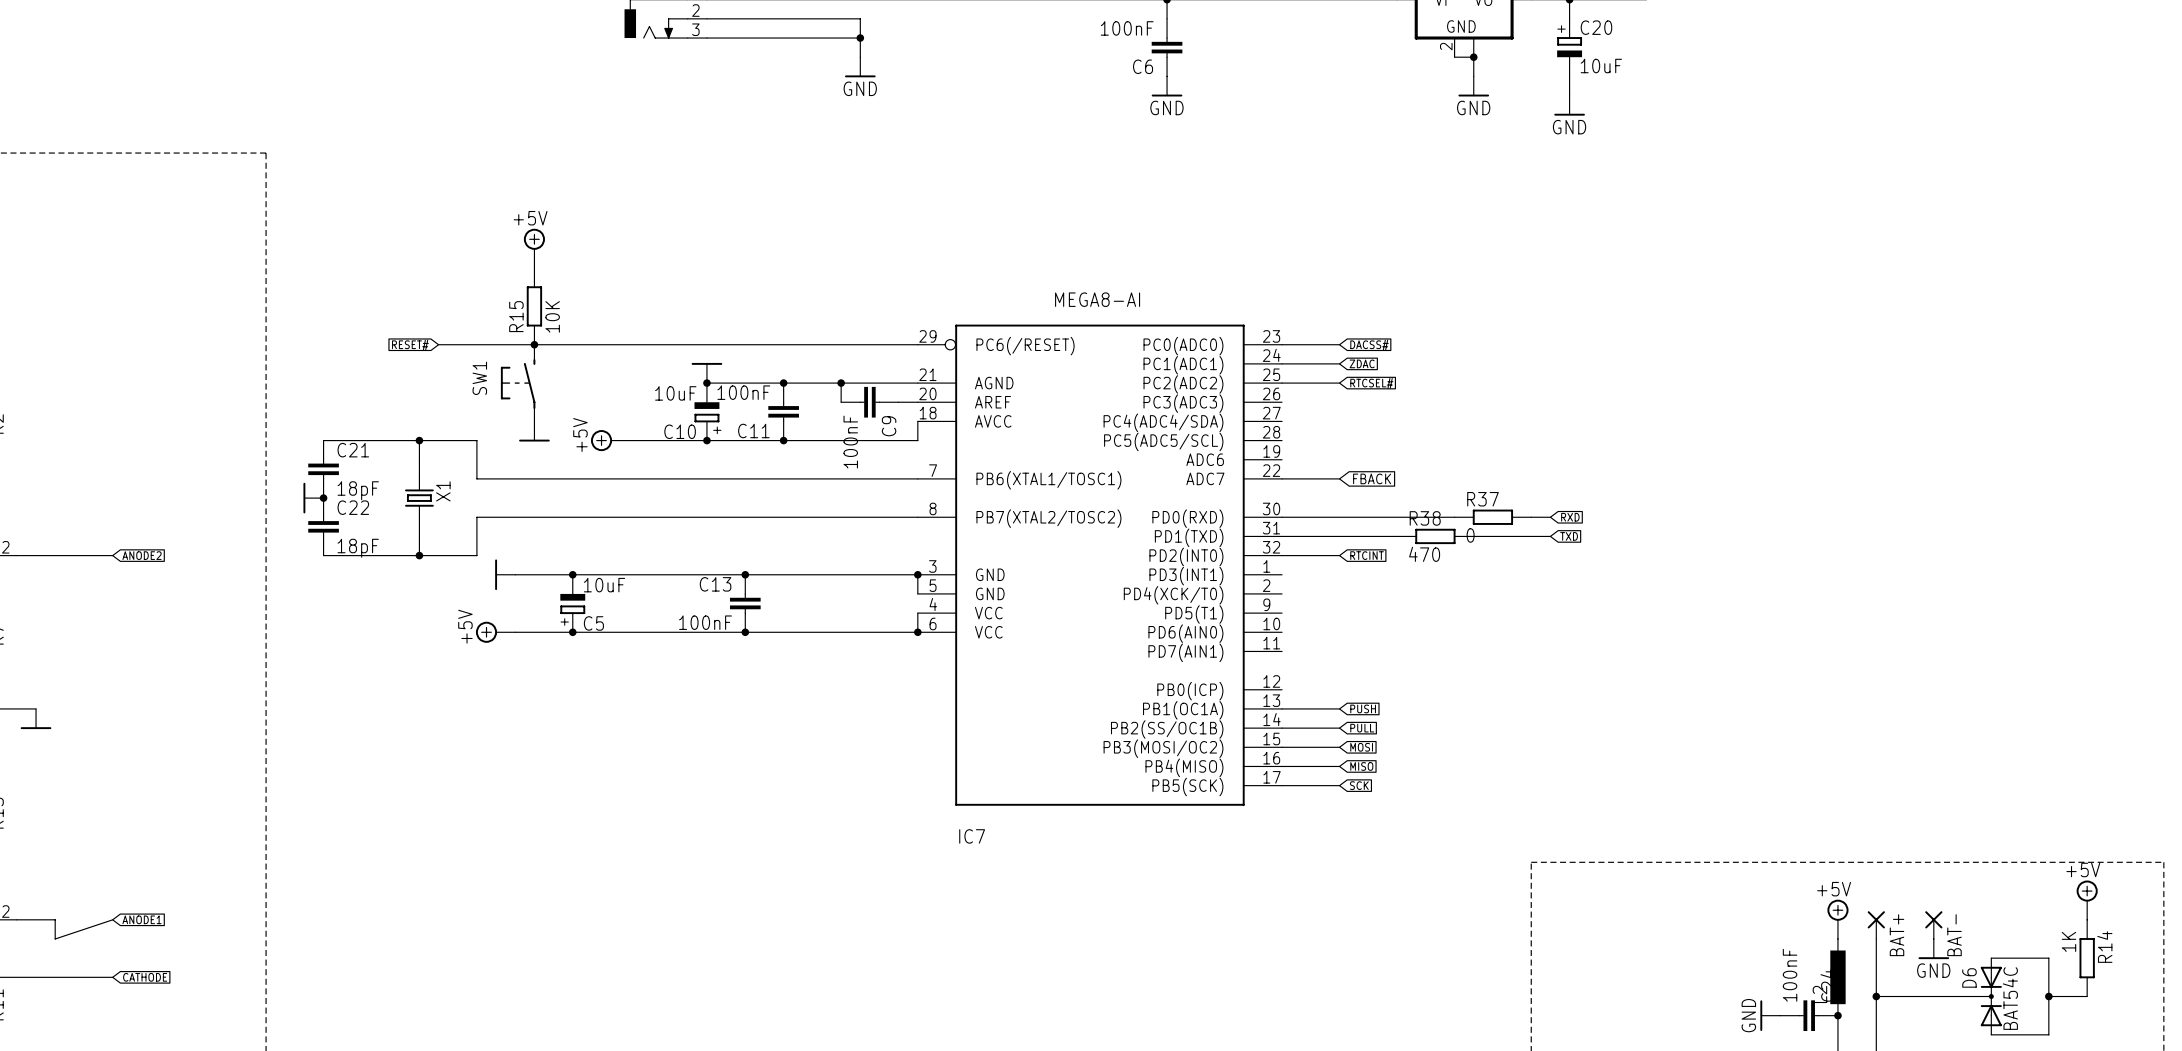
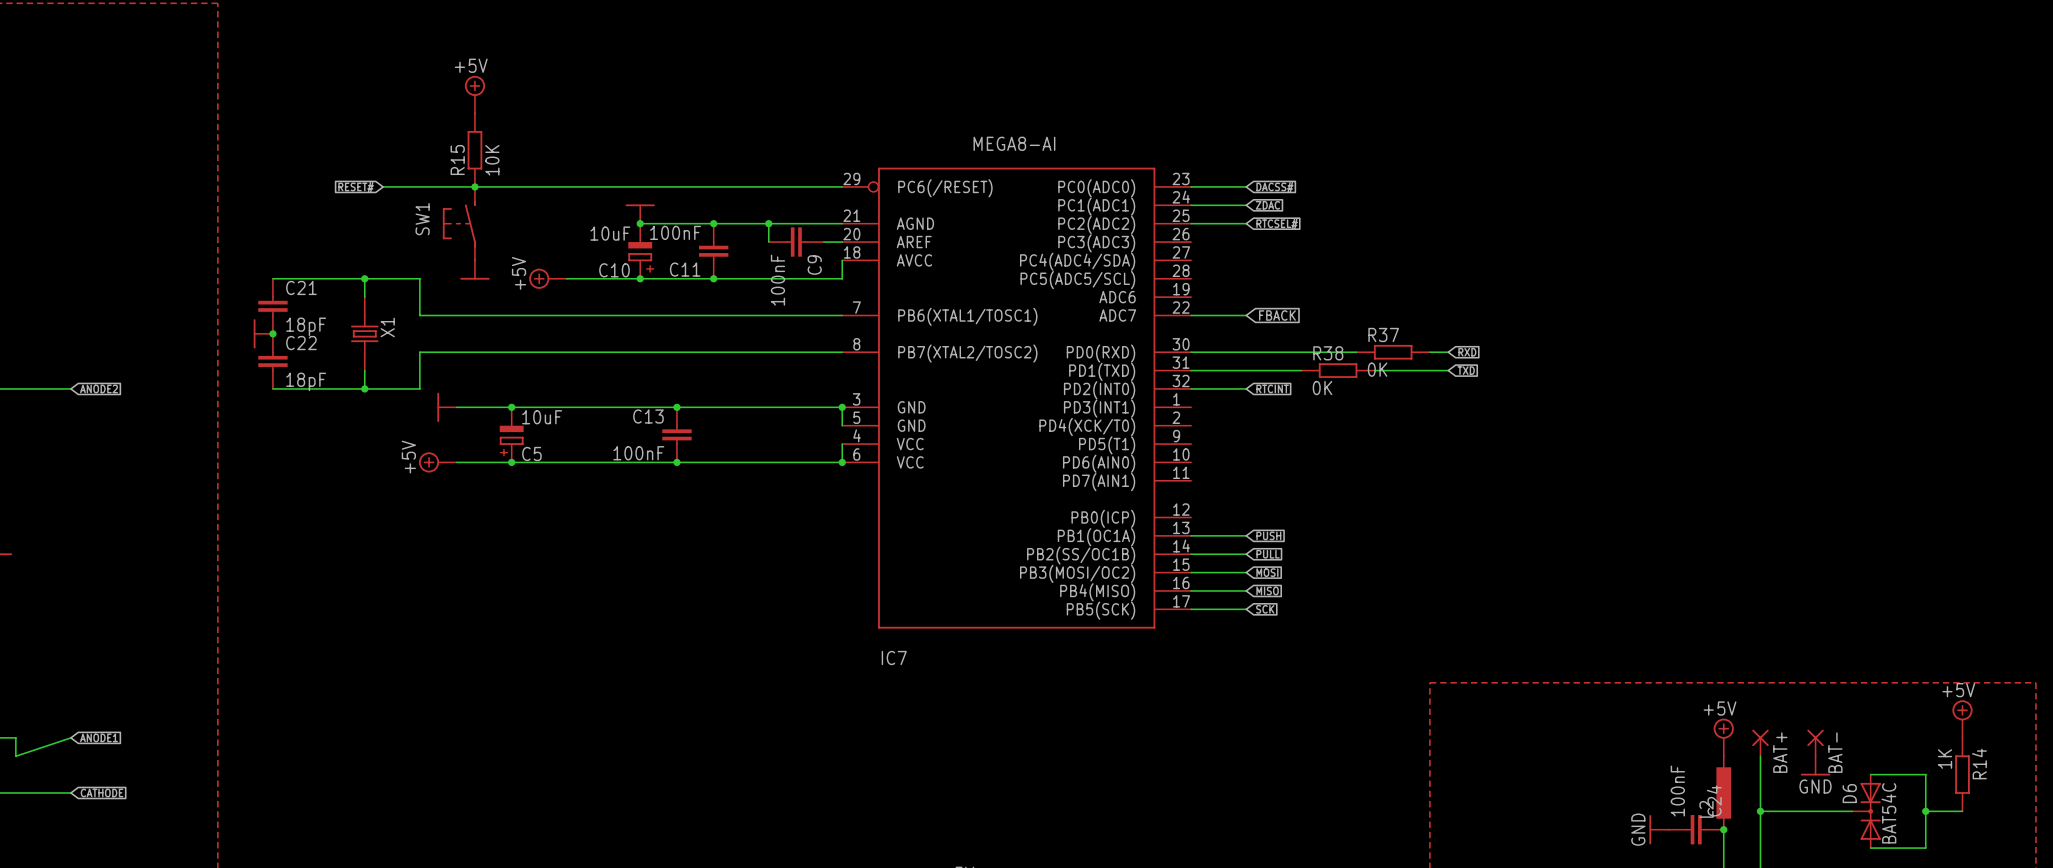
R37 value: 0 (1470, 535) -> 0K (1377, 369)
R38 value: 470 (1424, 554) -> 0K (1322, 388)

